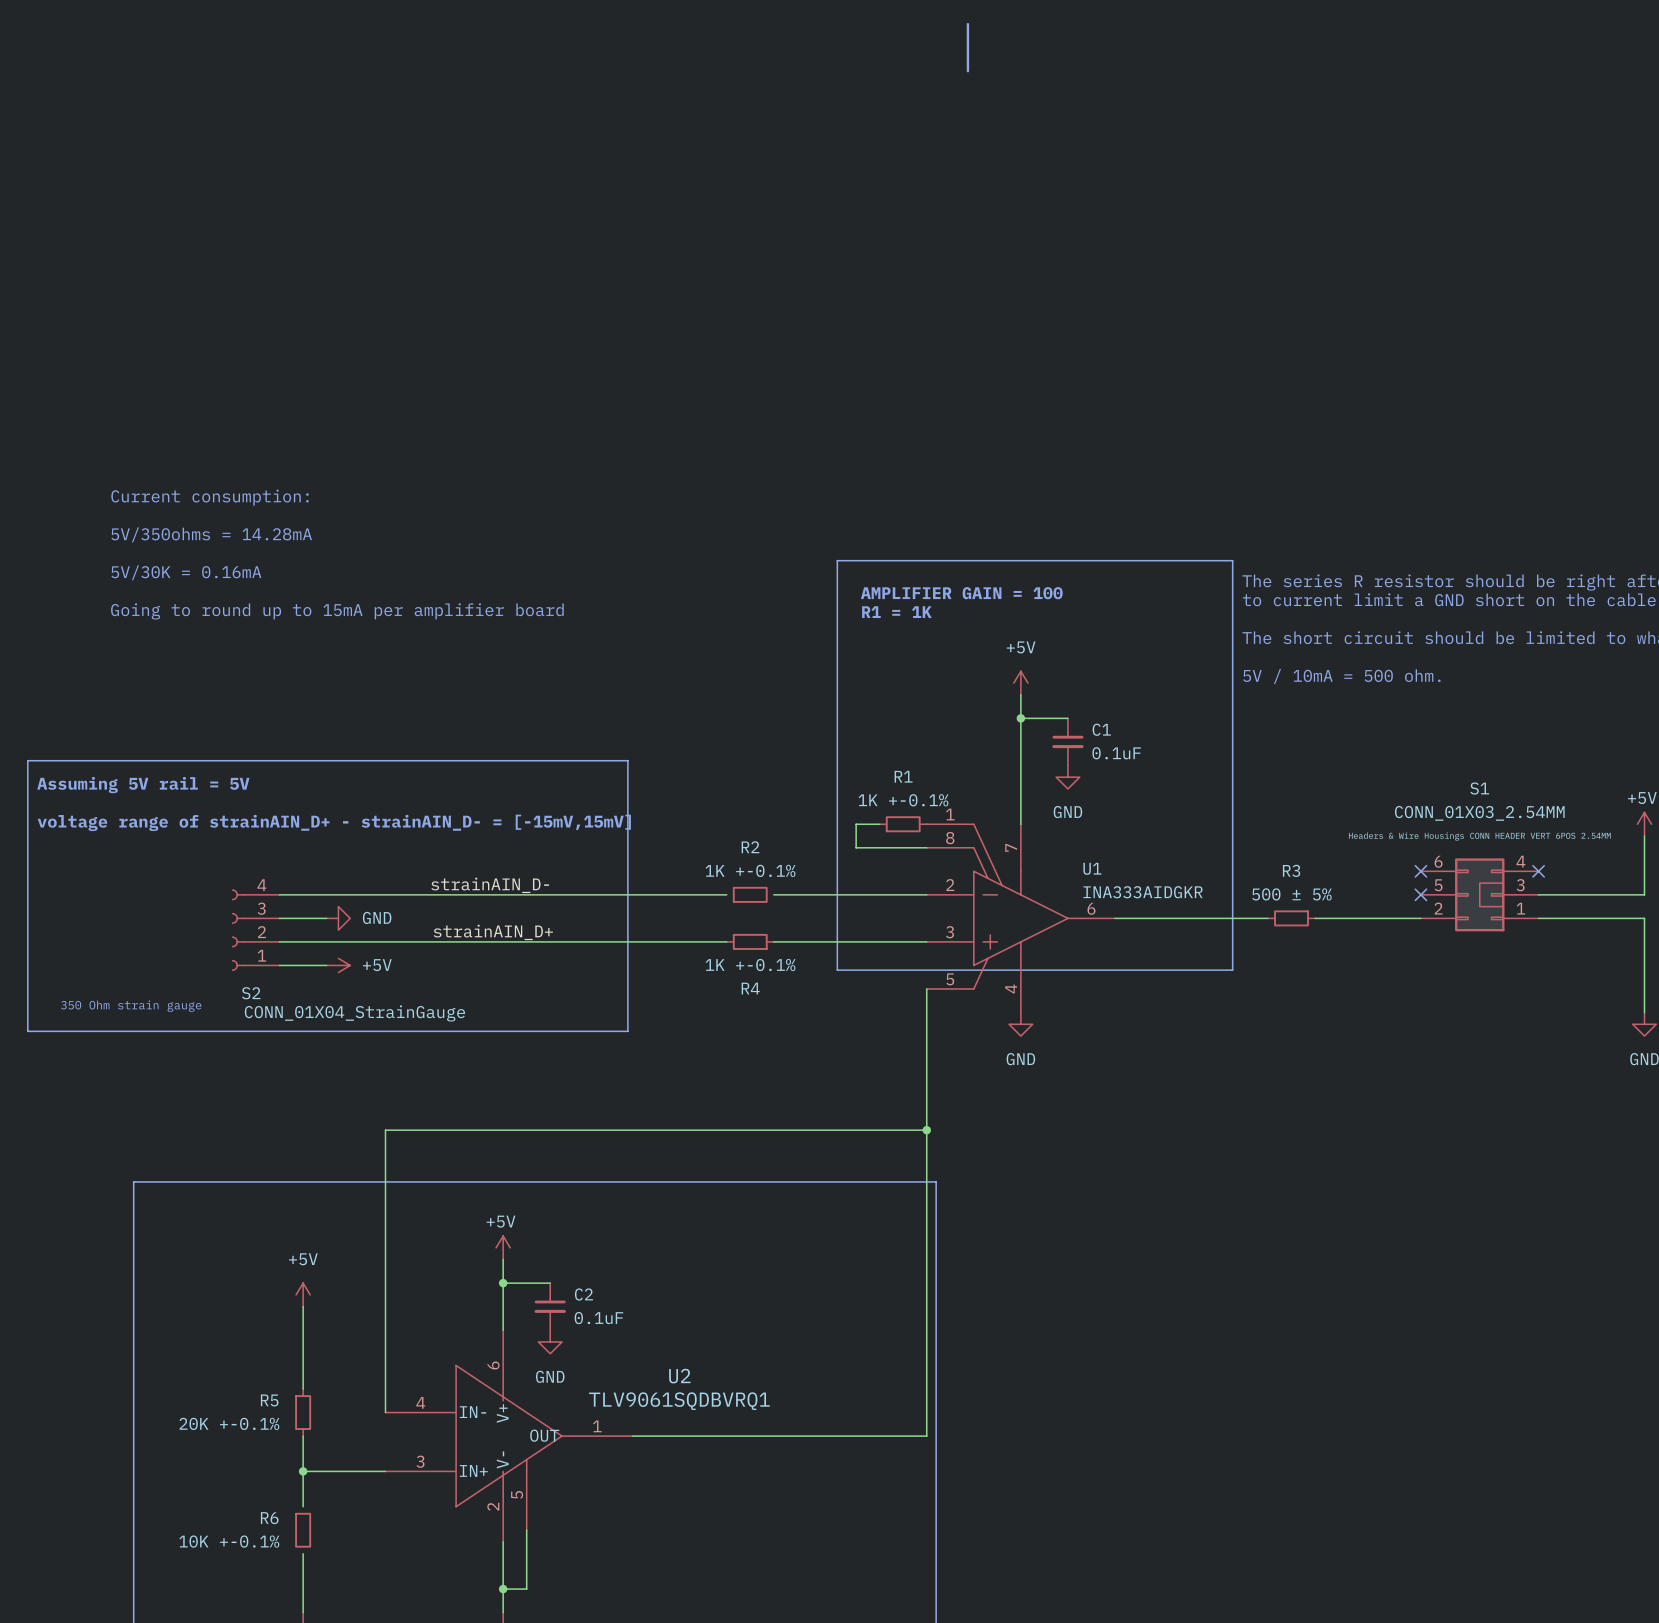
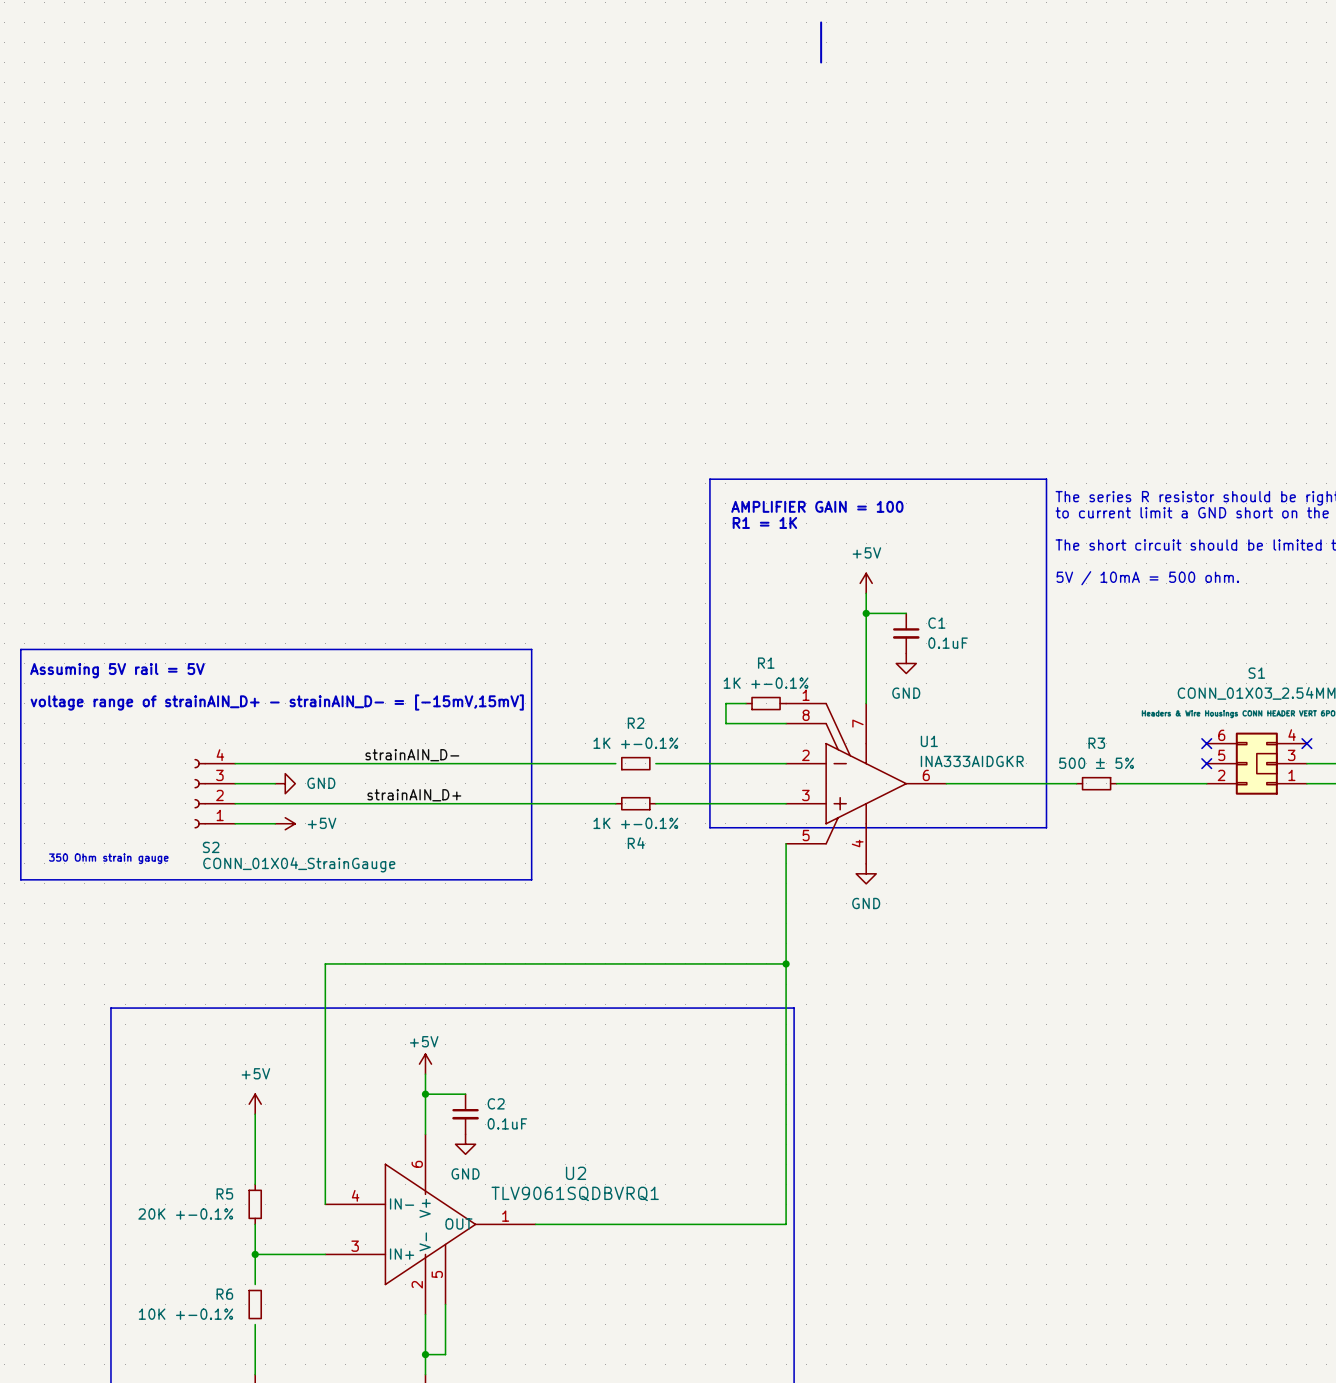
text: Current consumption: (210, 497) -> none
text: 5V/350ohms = 14.28mA (211, 534) -> none
text: 5V/30K = 0.16mA (186, 572) -> none
text: Going to round up to 15mA per amplifier board (337, 611) -> none

